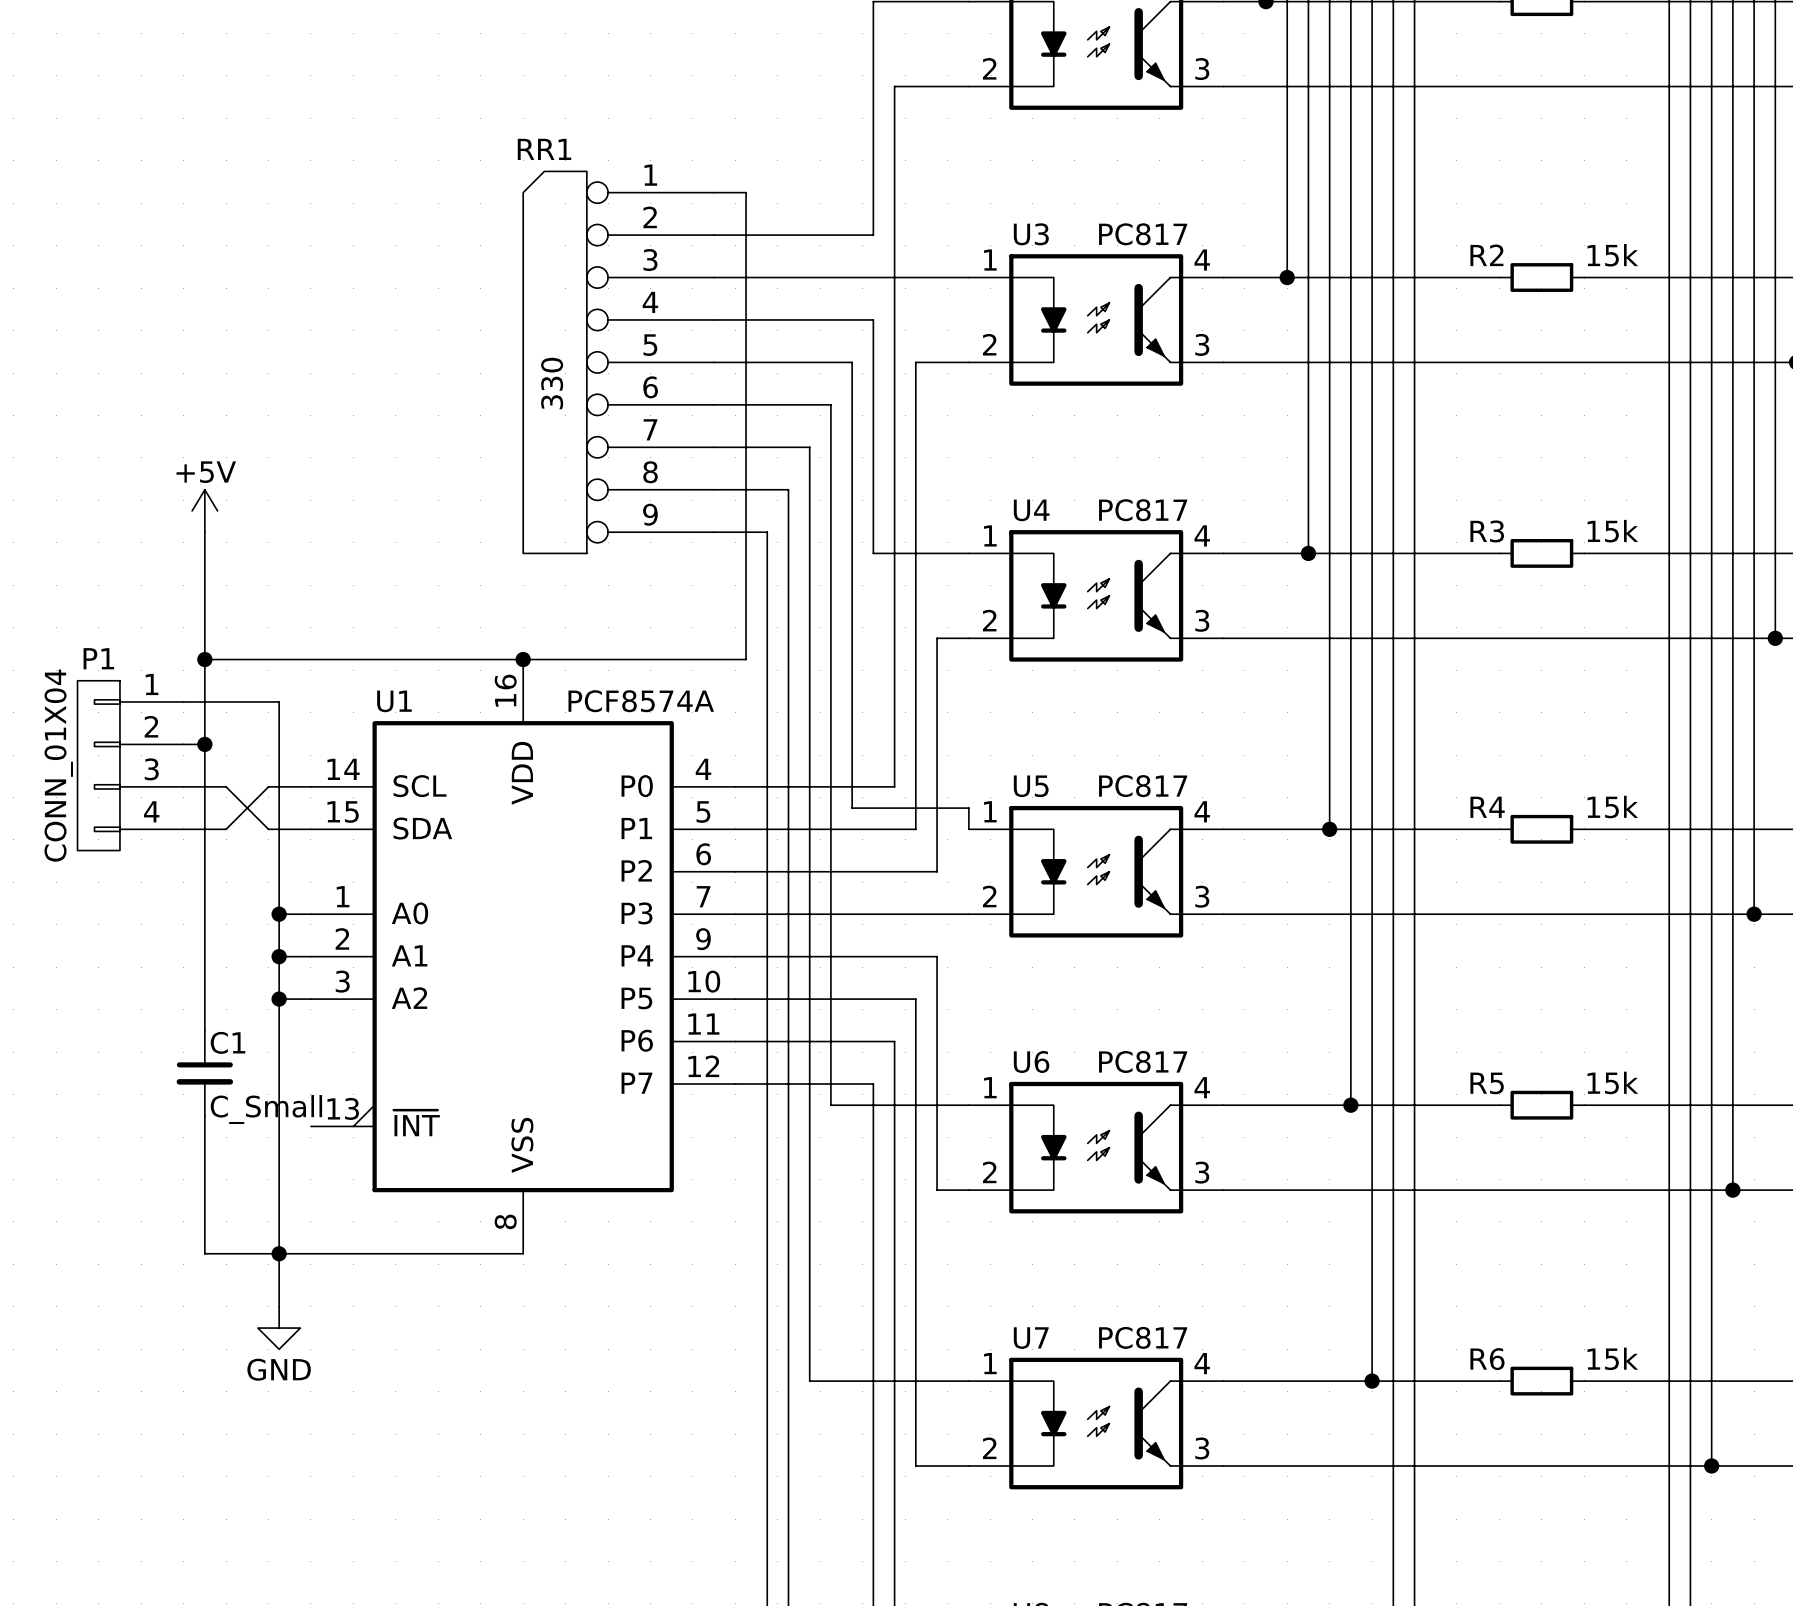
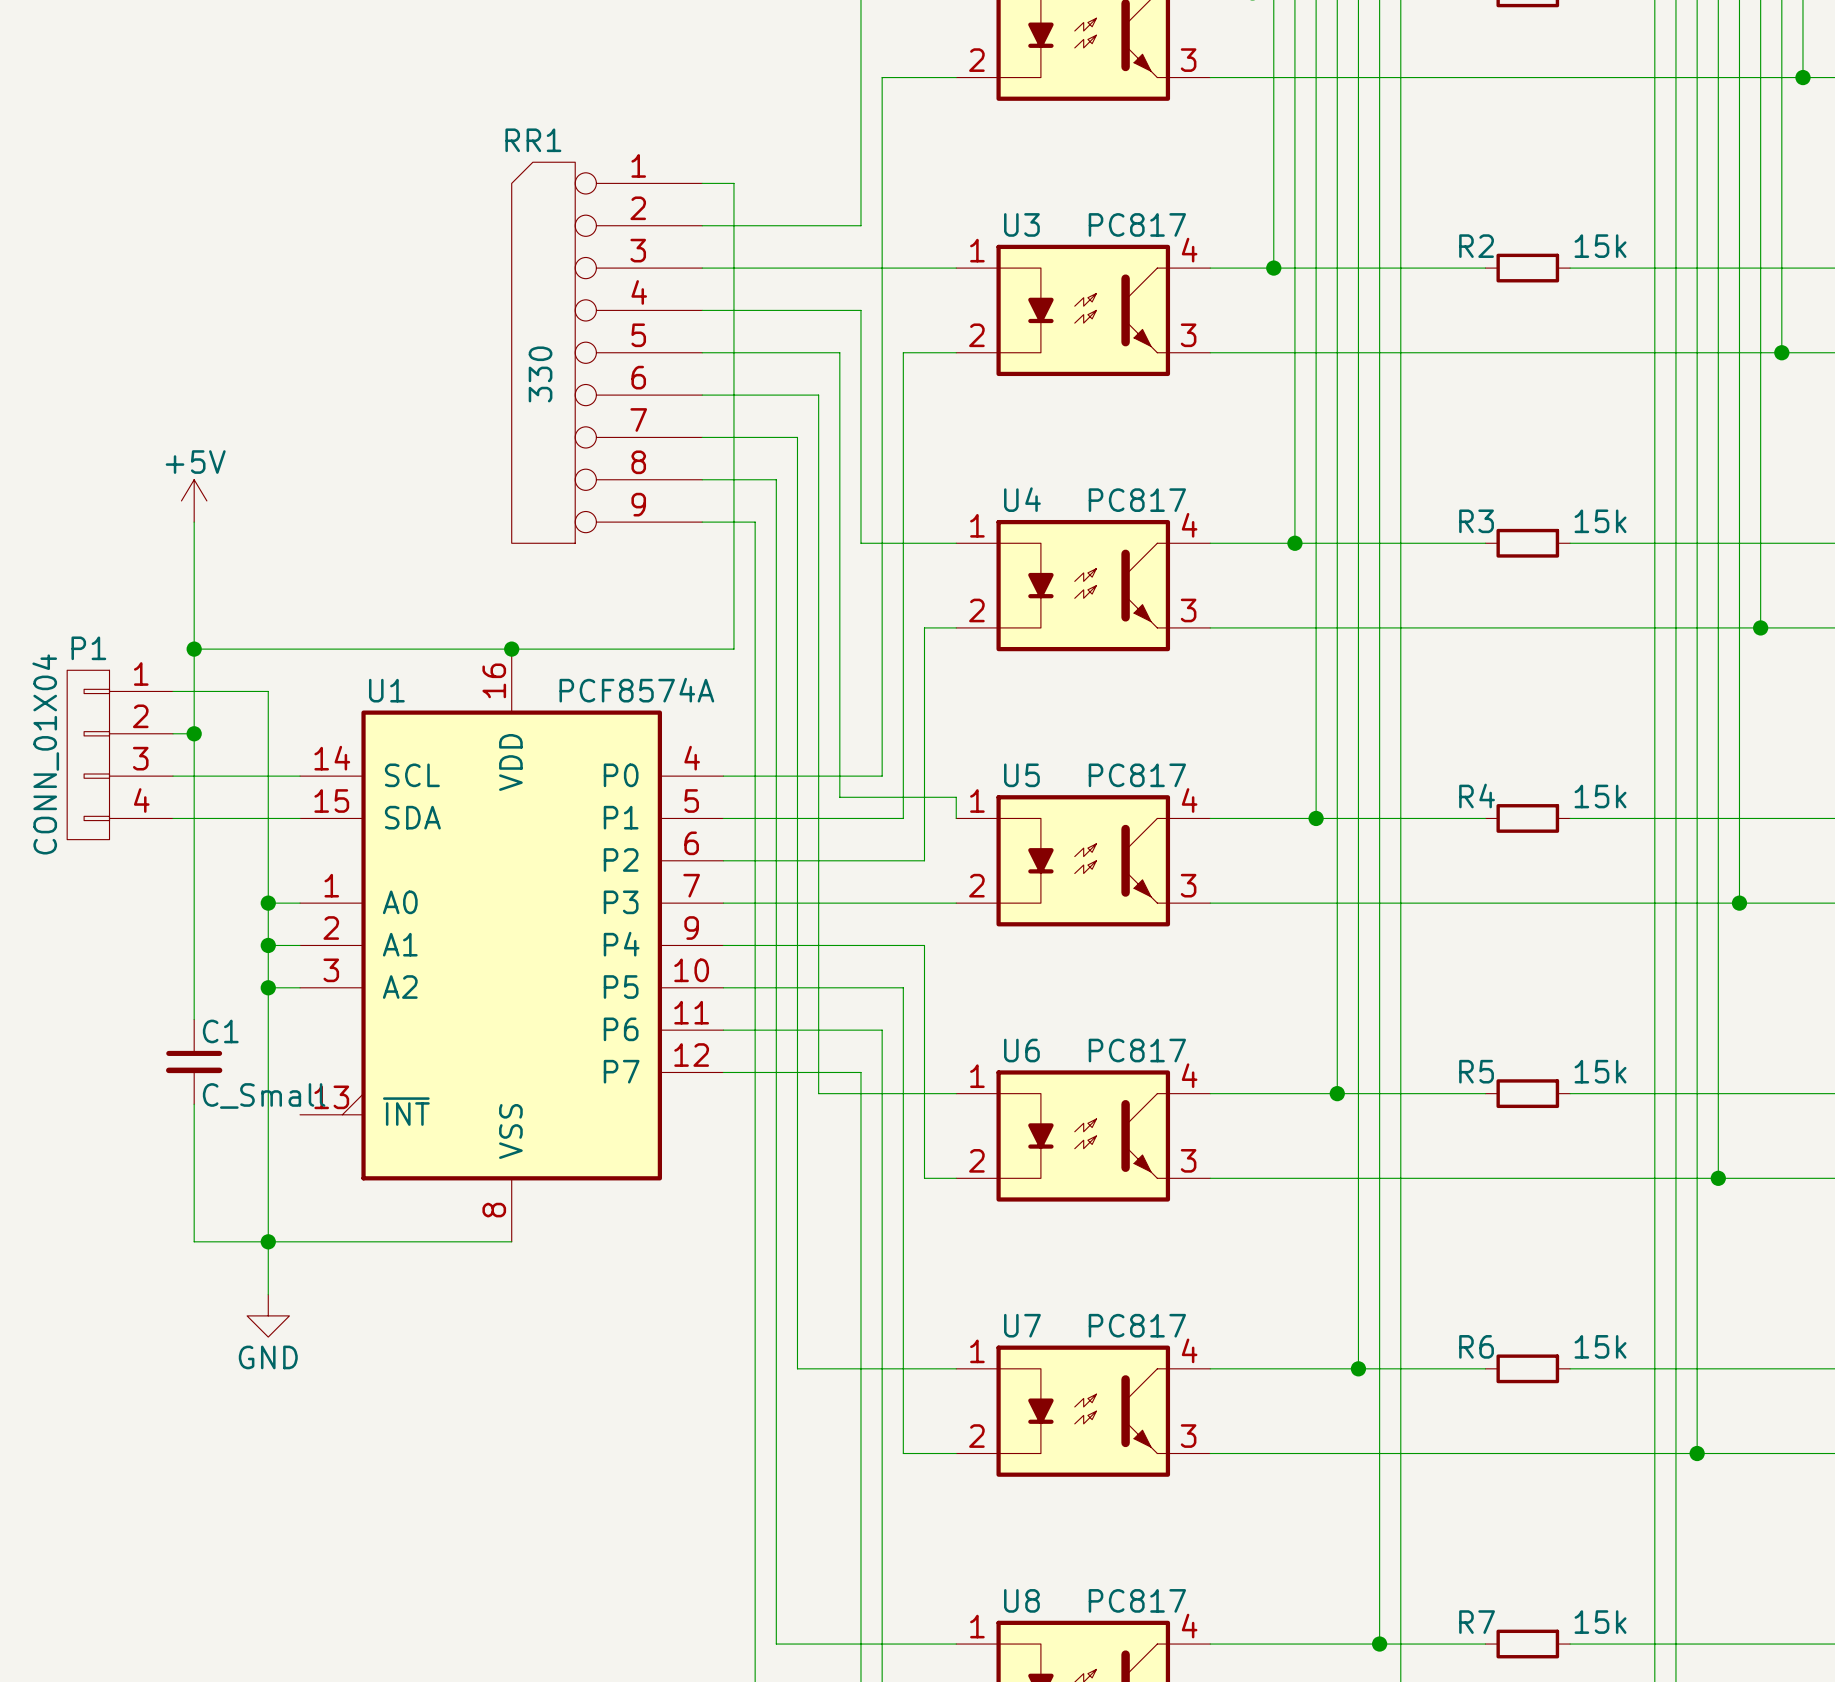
wire: (226, 786) (268, 829) -> (215, 776) (257, 776)
wire: (268, 786) (226, 829) -> (257, 818) (215, 818)

